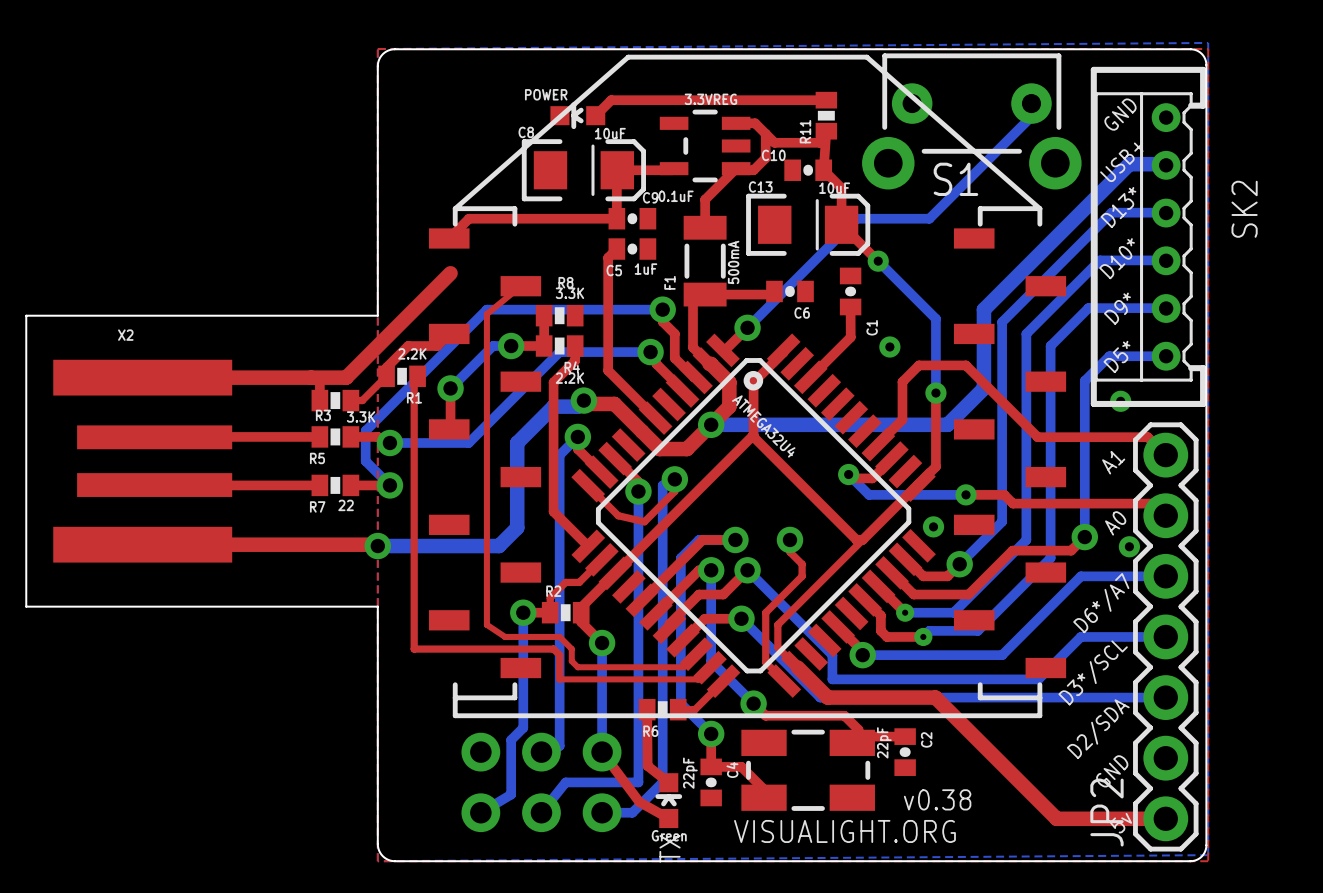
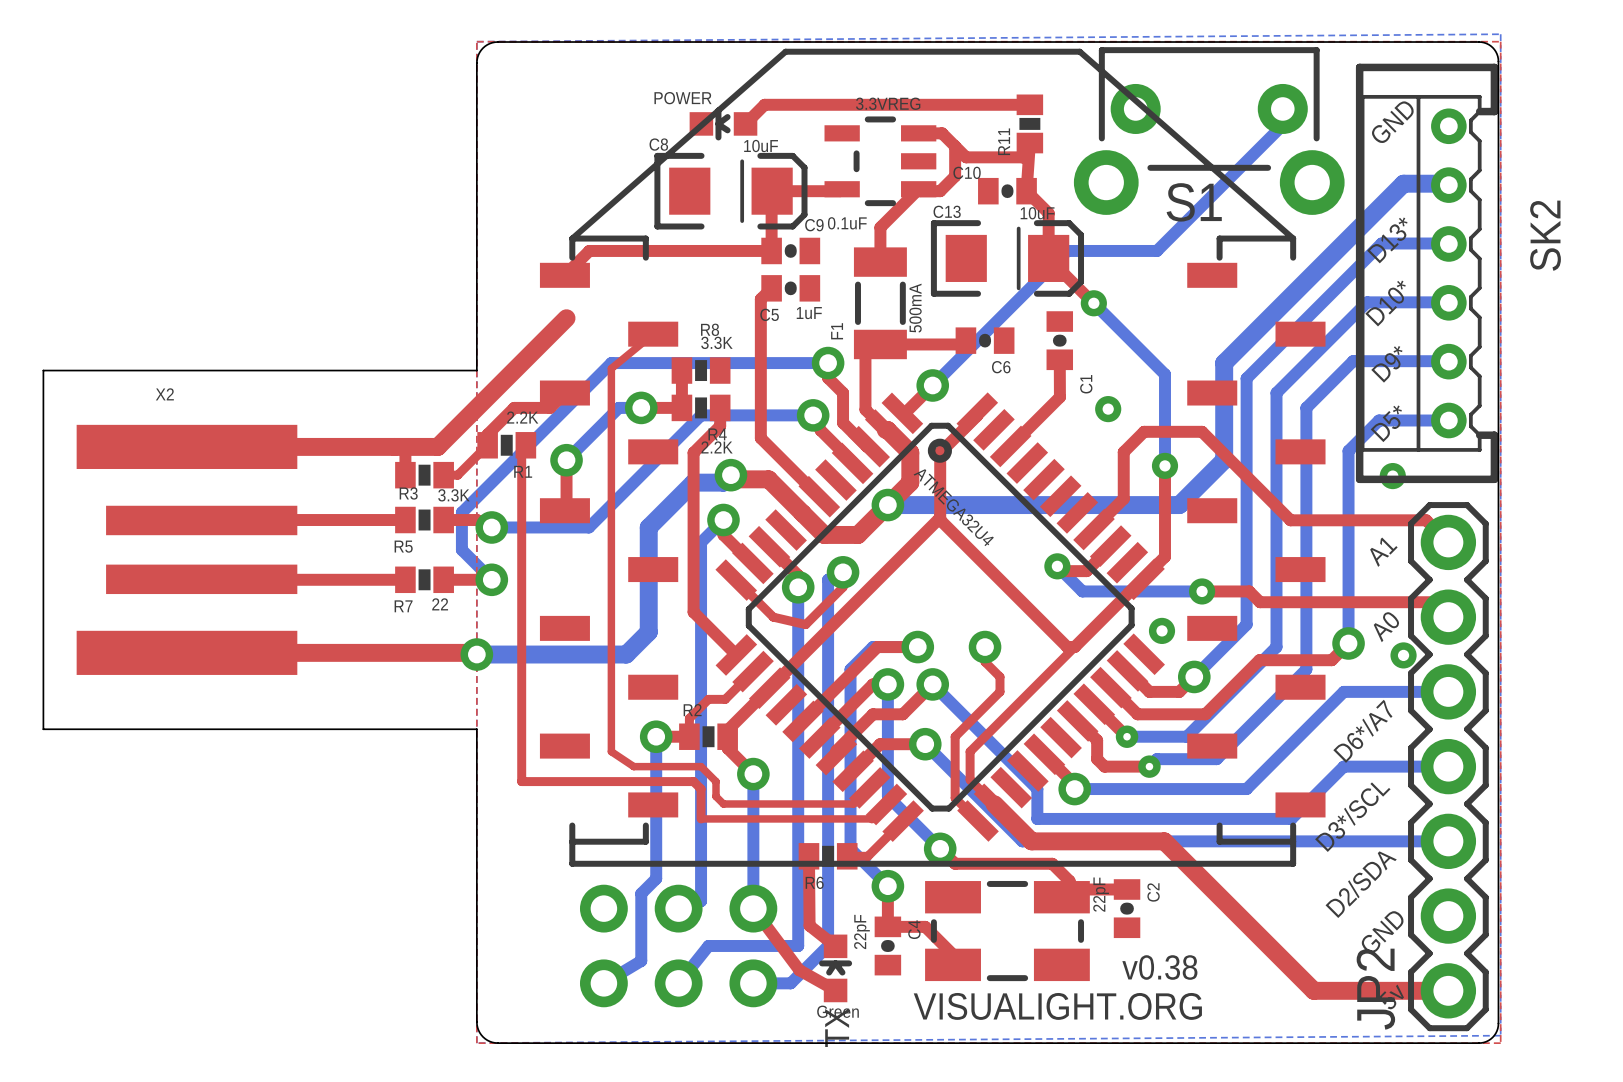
text: USB+ (1121, 162) -> none

